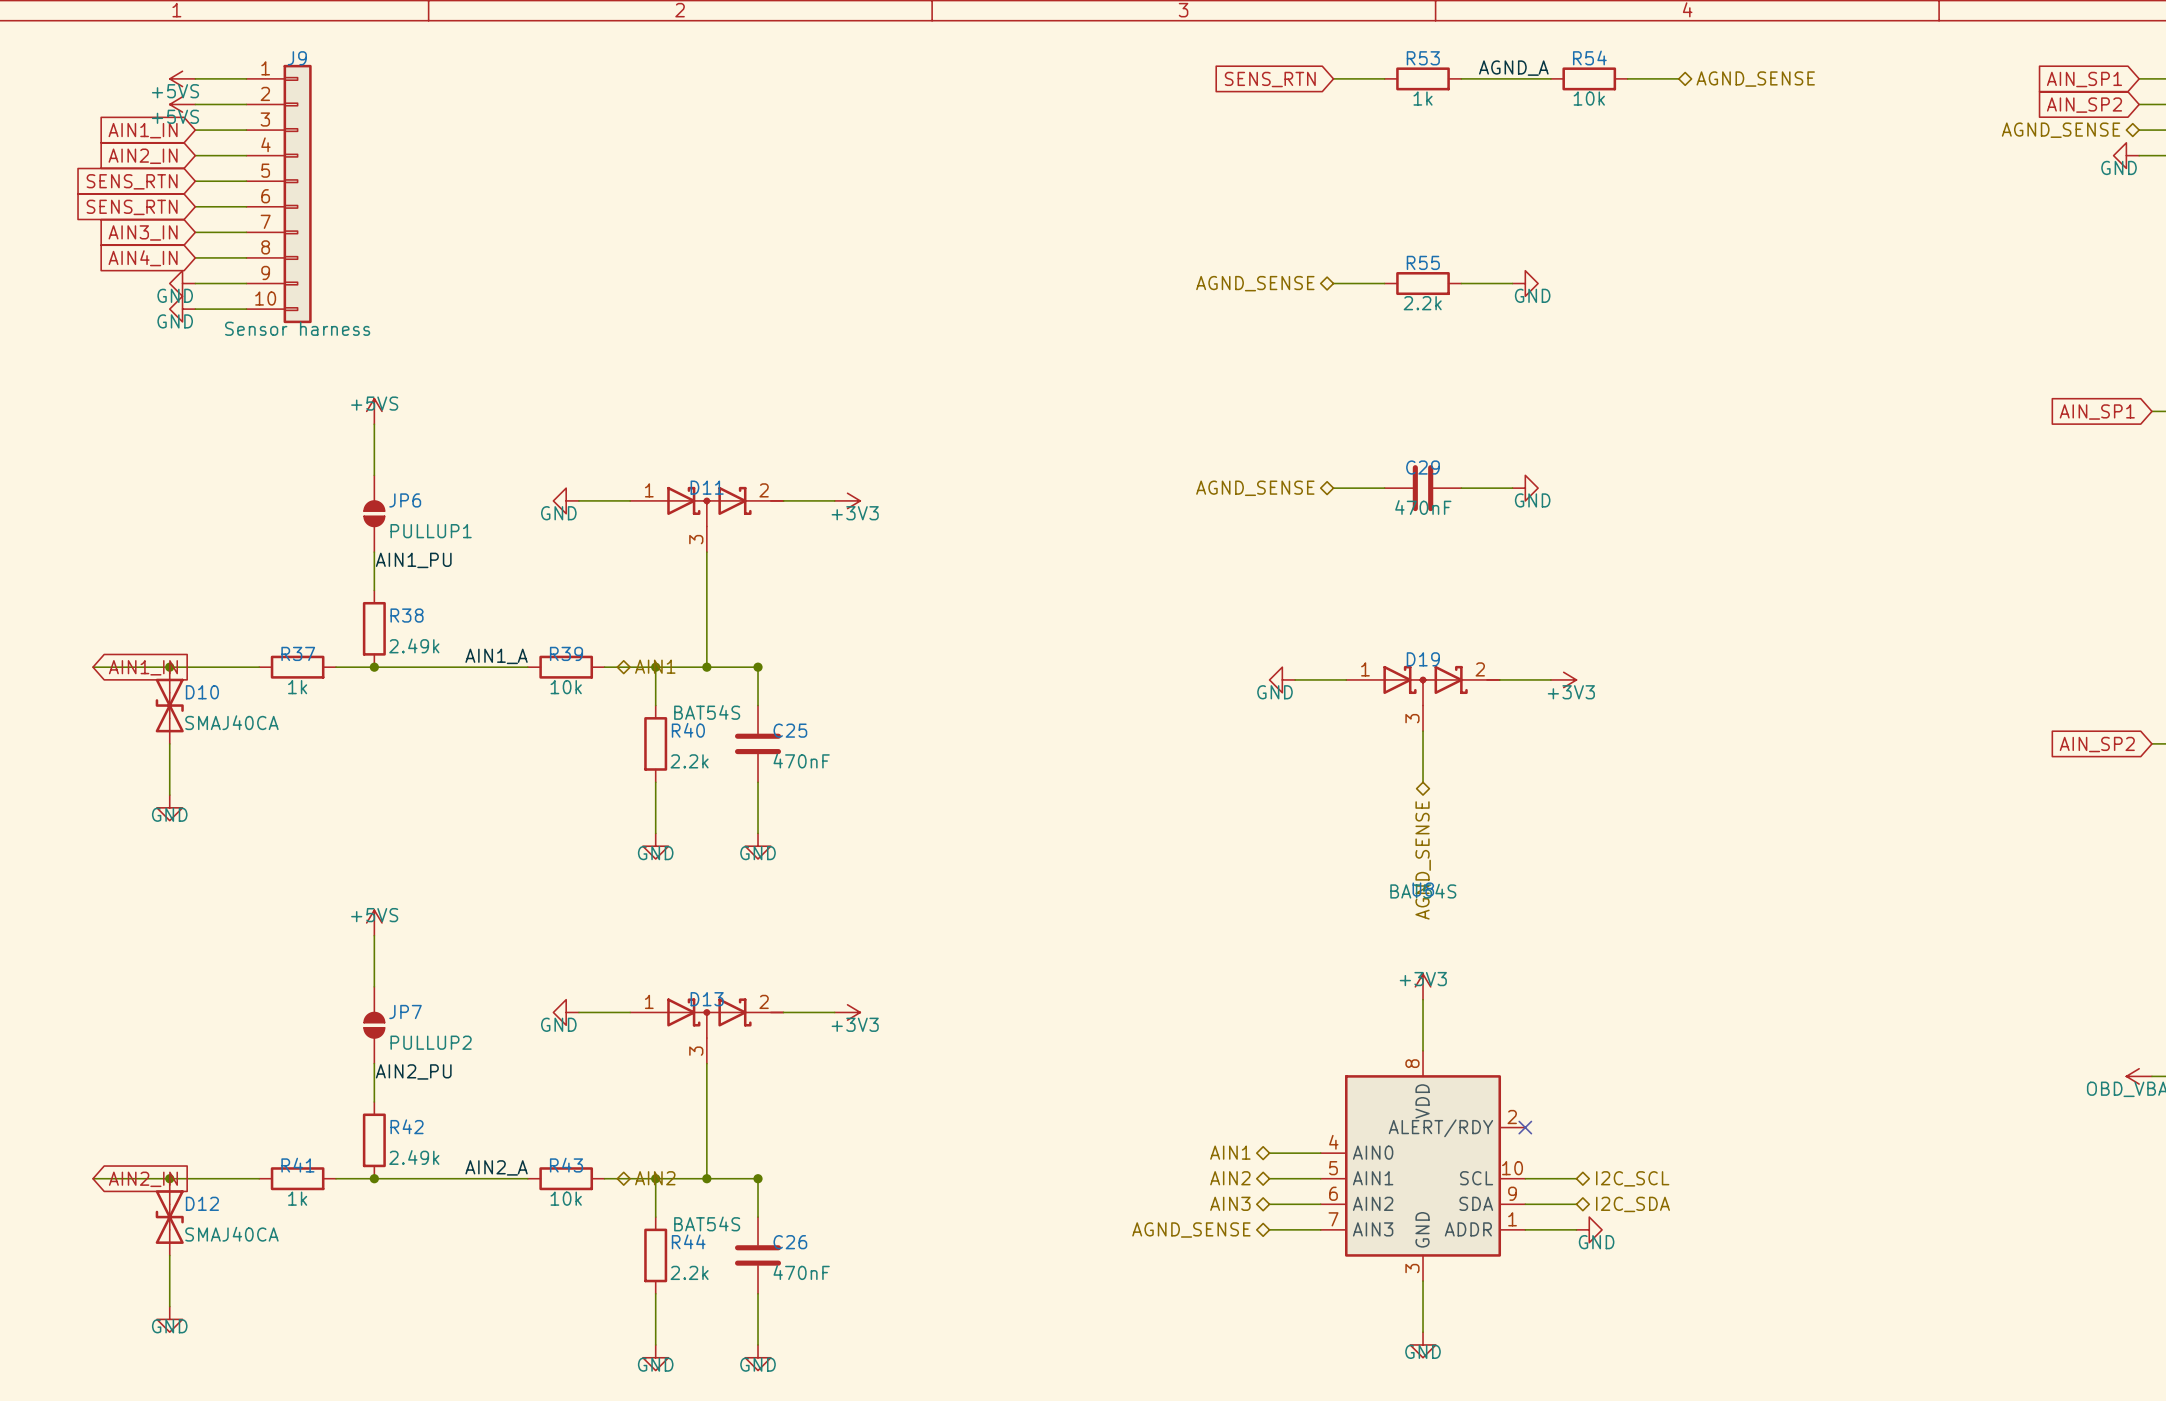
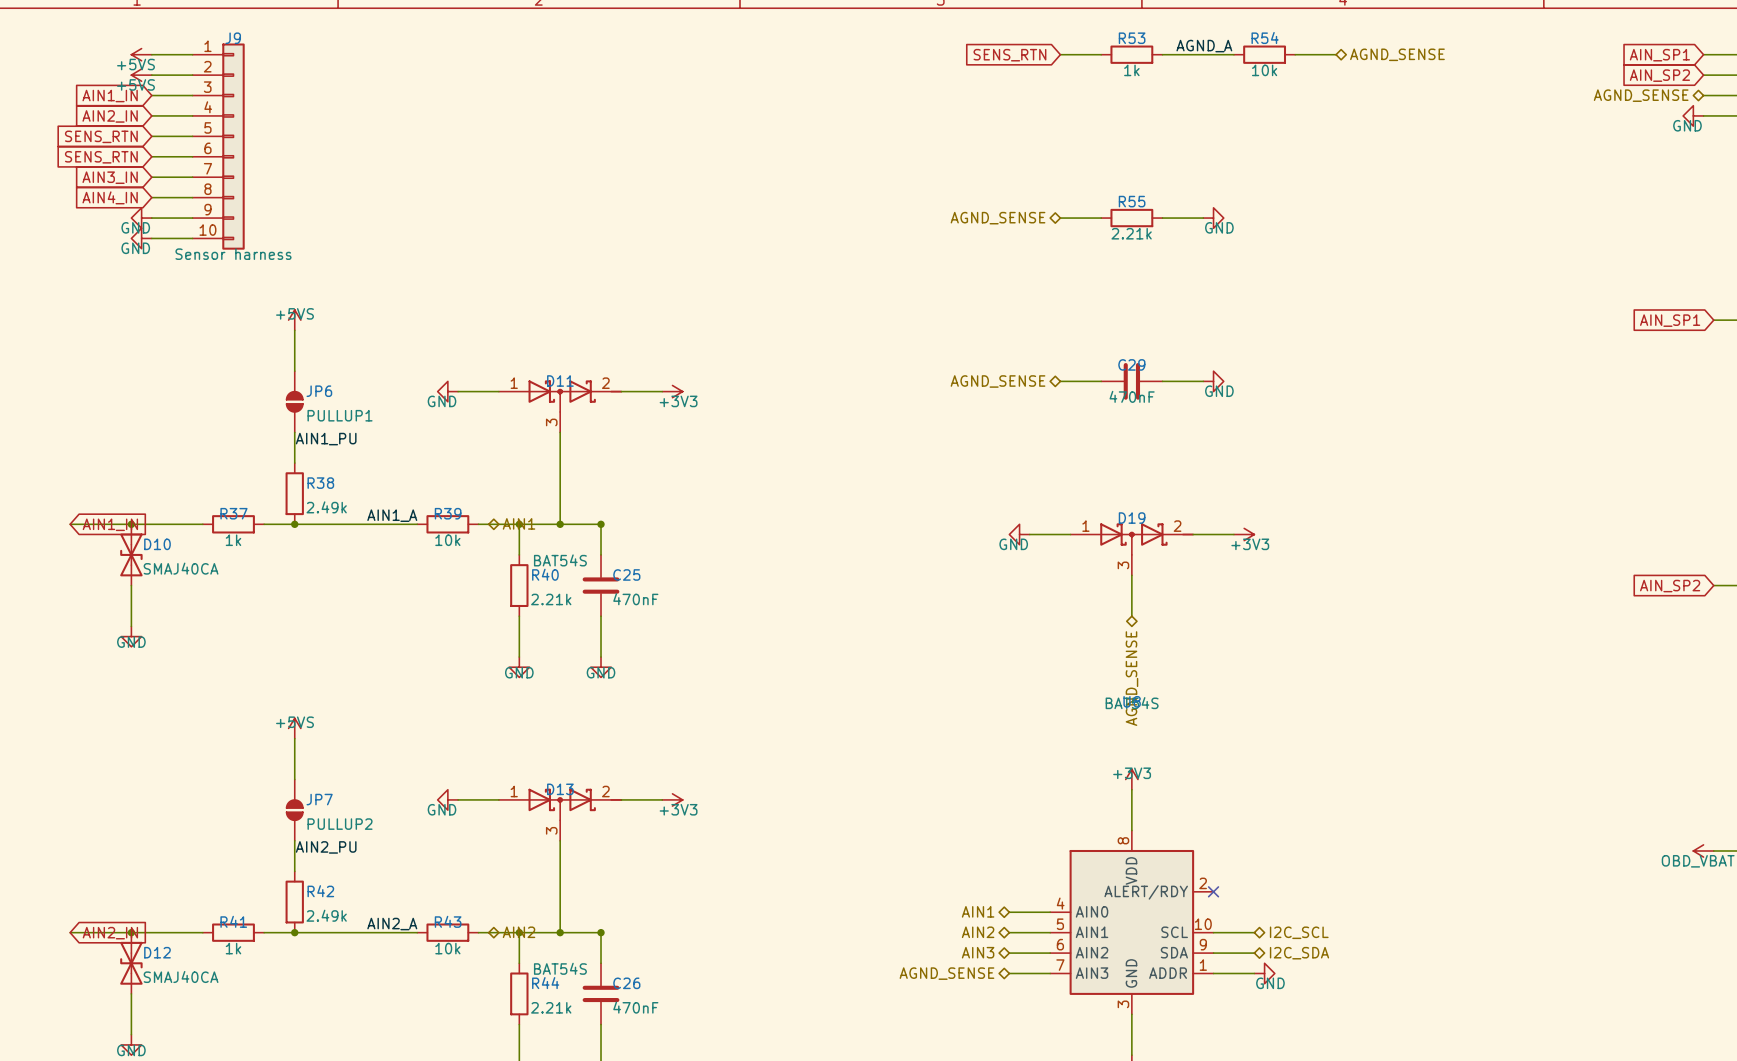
R55 value: 2.2k (1422, 303) -> 2.21k (1131, 233)
R40 value: 2.2k (689, 761) -> 2.21k (551, 599)
R44 value: 2.2k (689, 1272) -> 2.21k (551, 1007)

